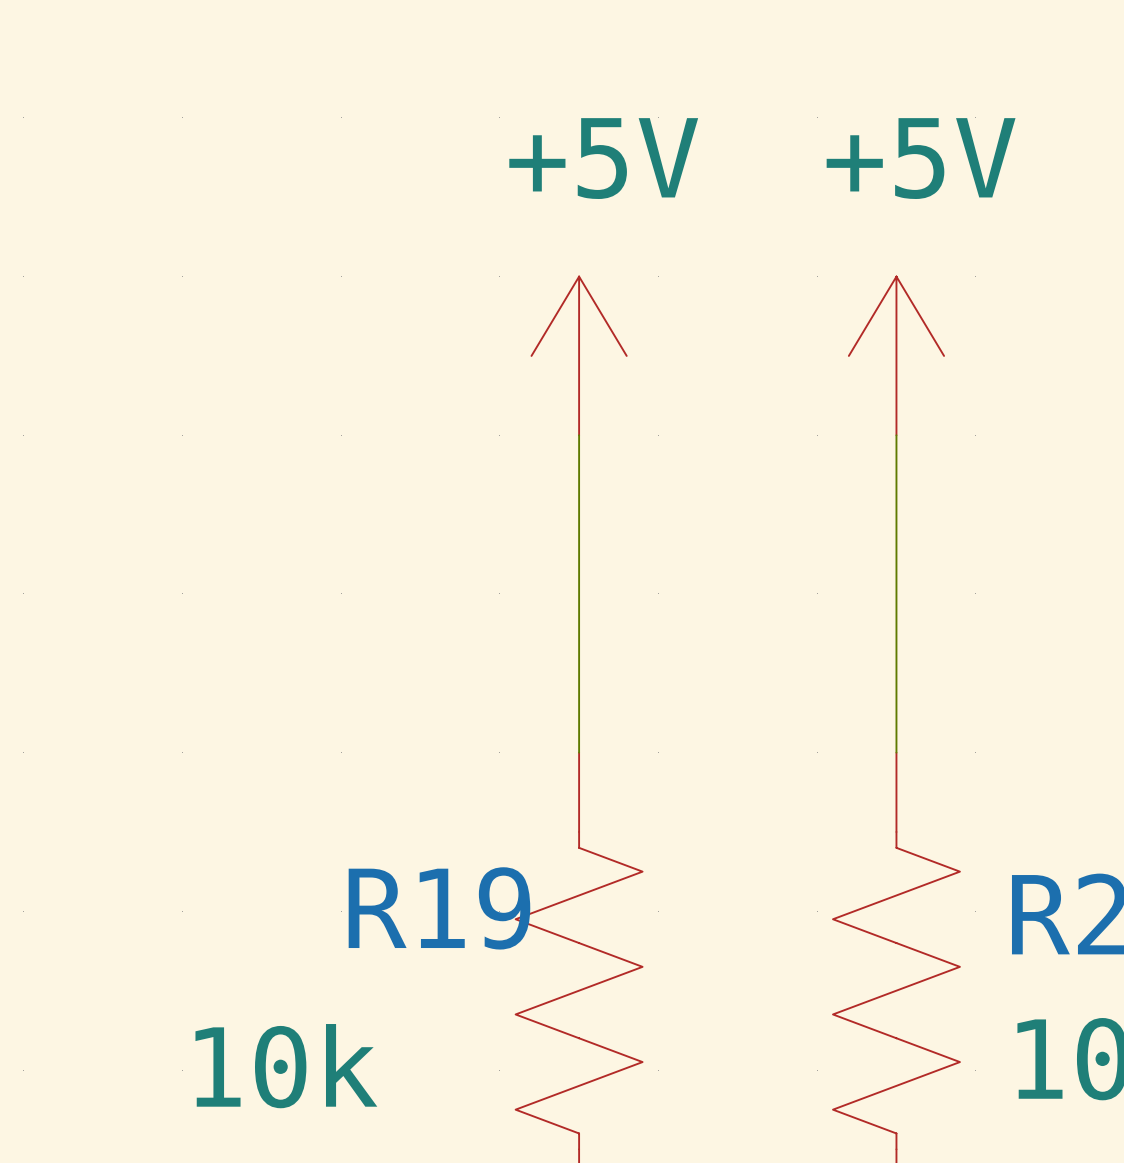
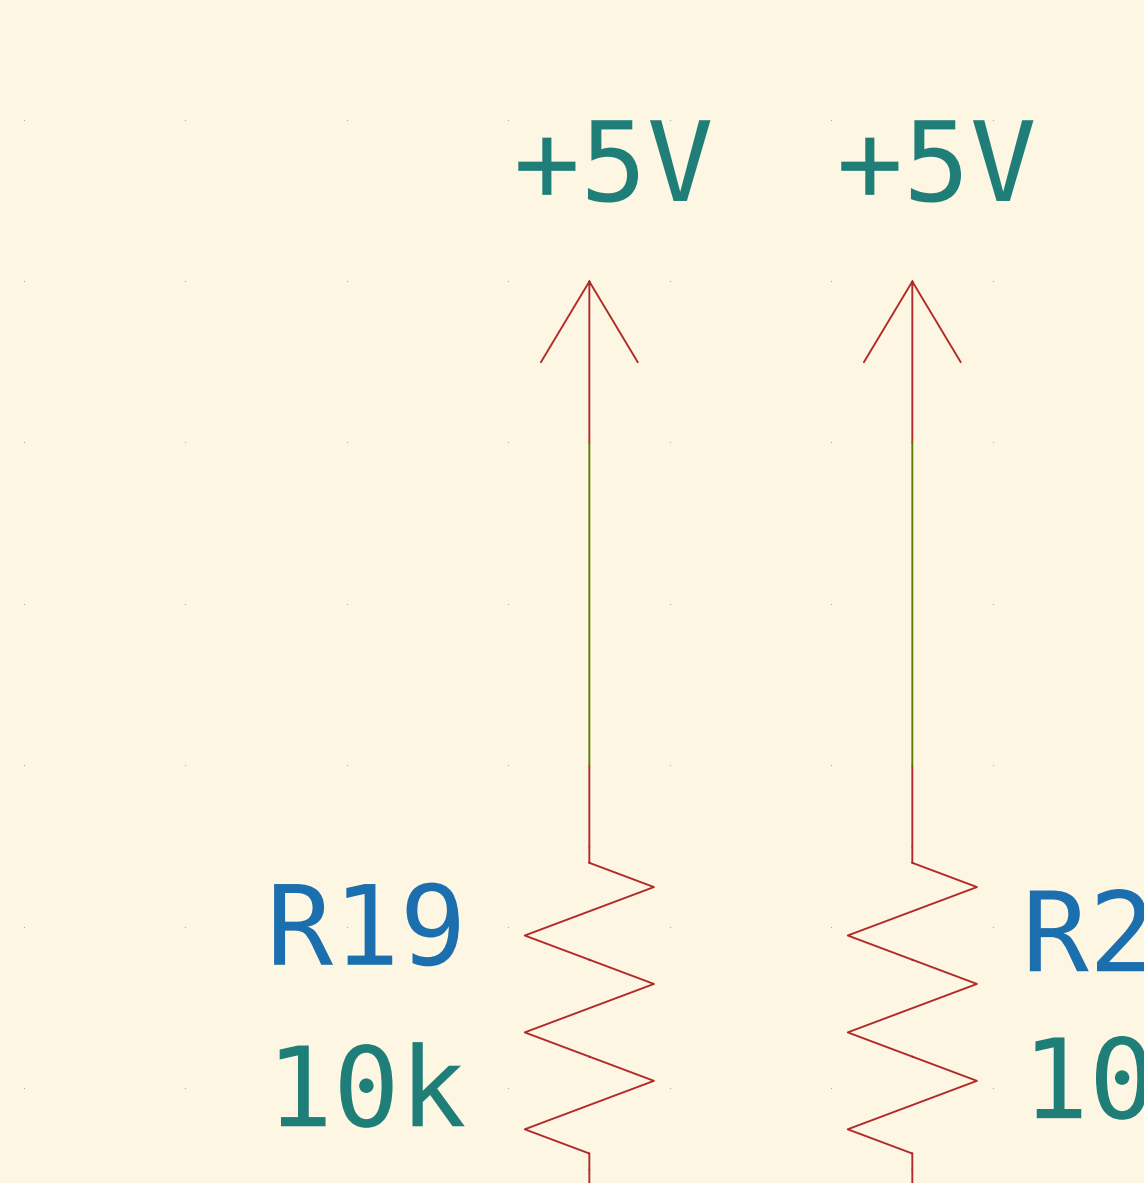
R19 name position: R19 (439, 908) -> R19 (366, 924)
R19 value position: 10k (286, 1066) -> 10k (372, 1084)

